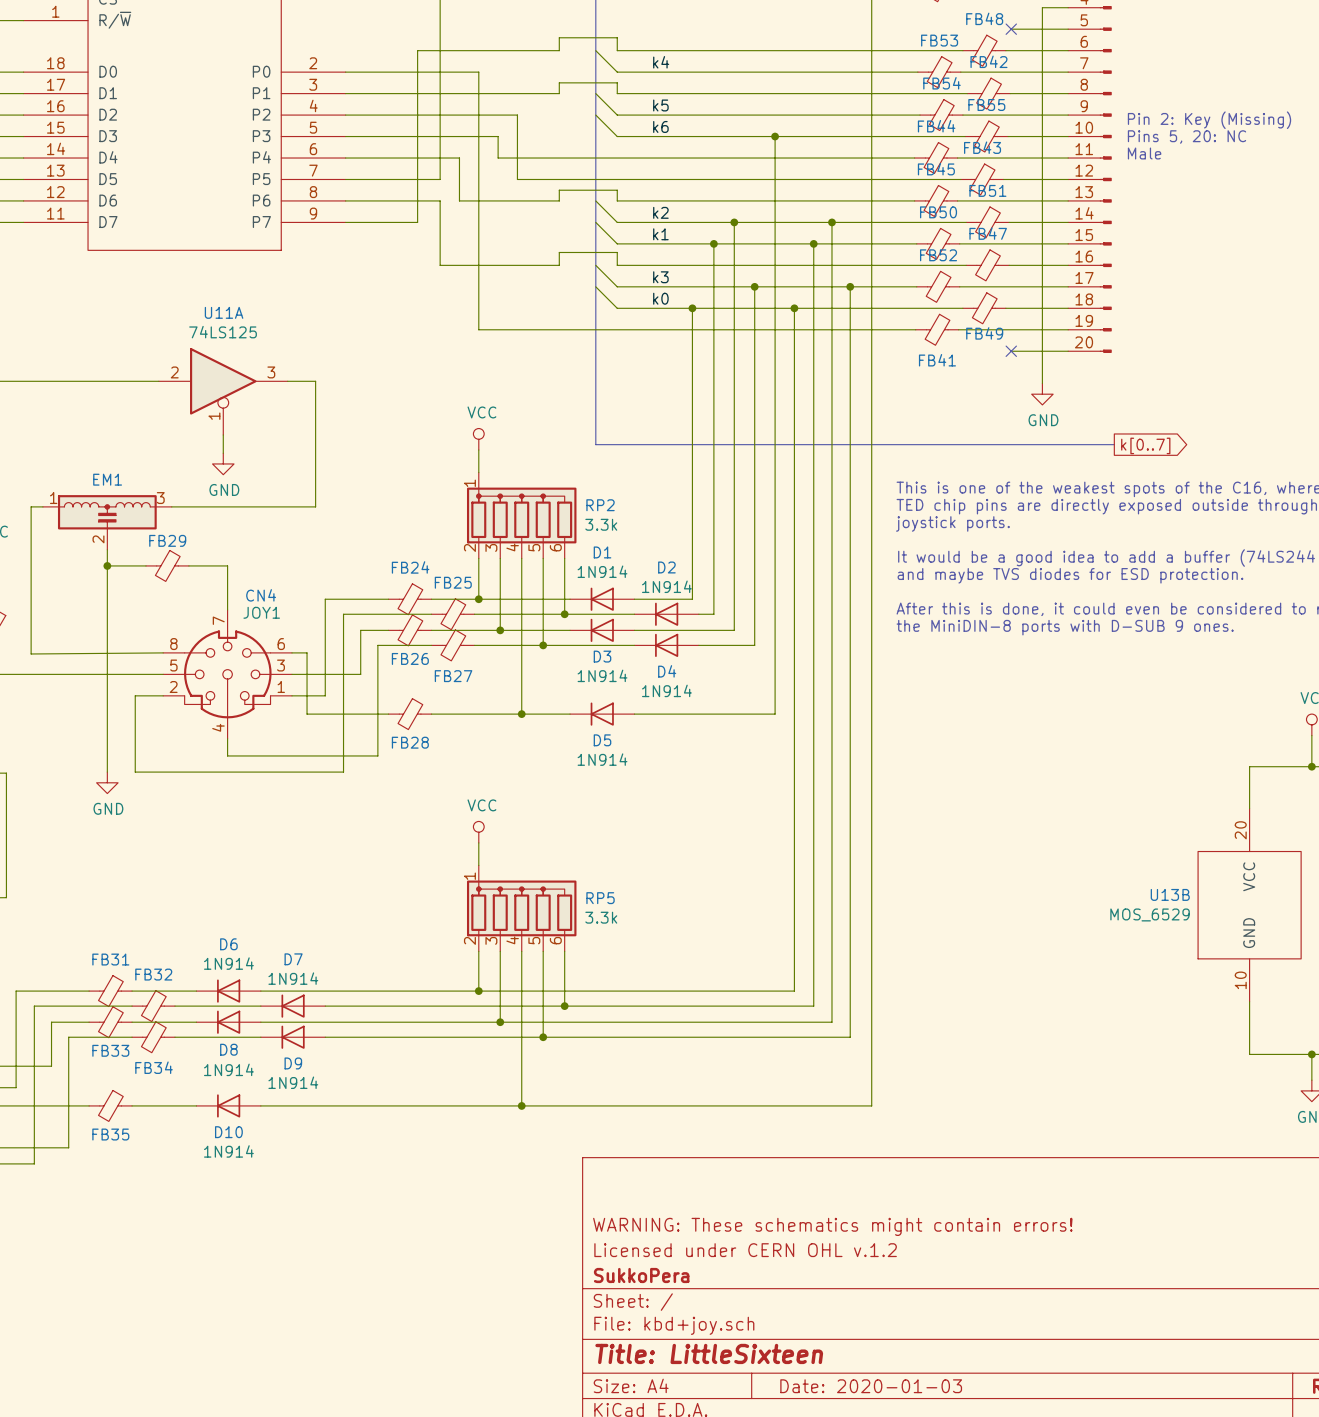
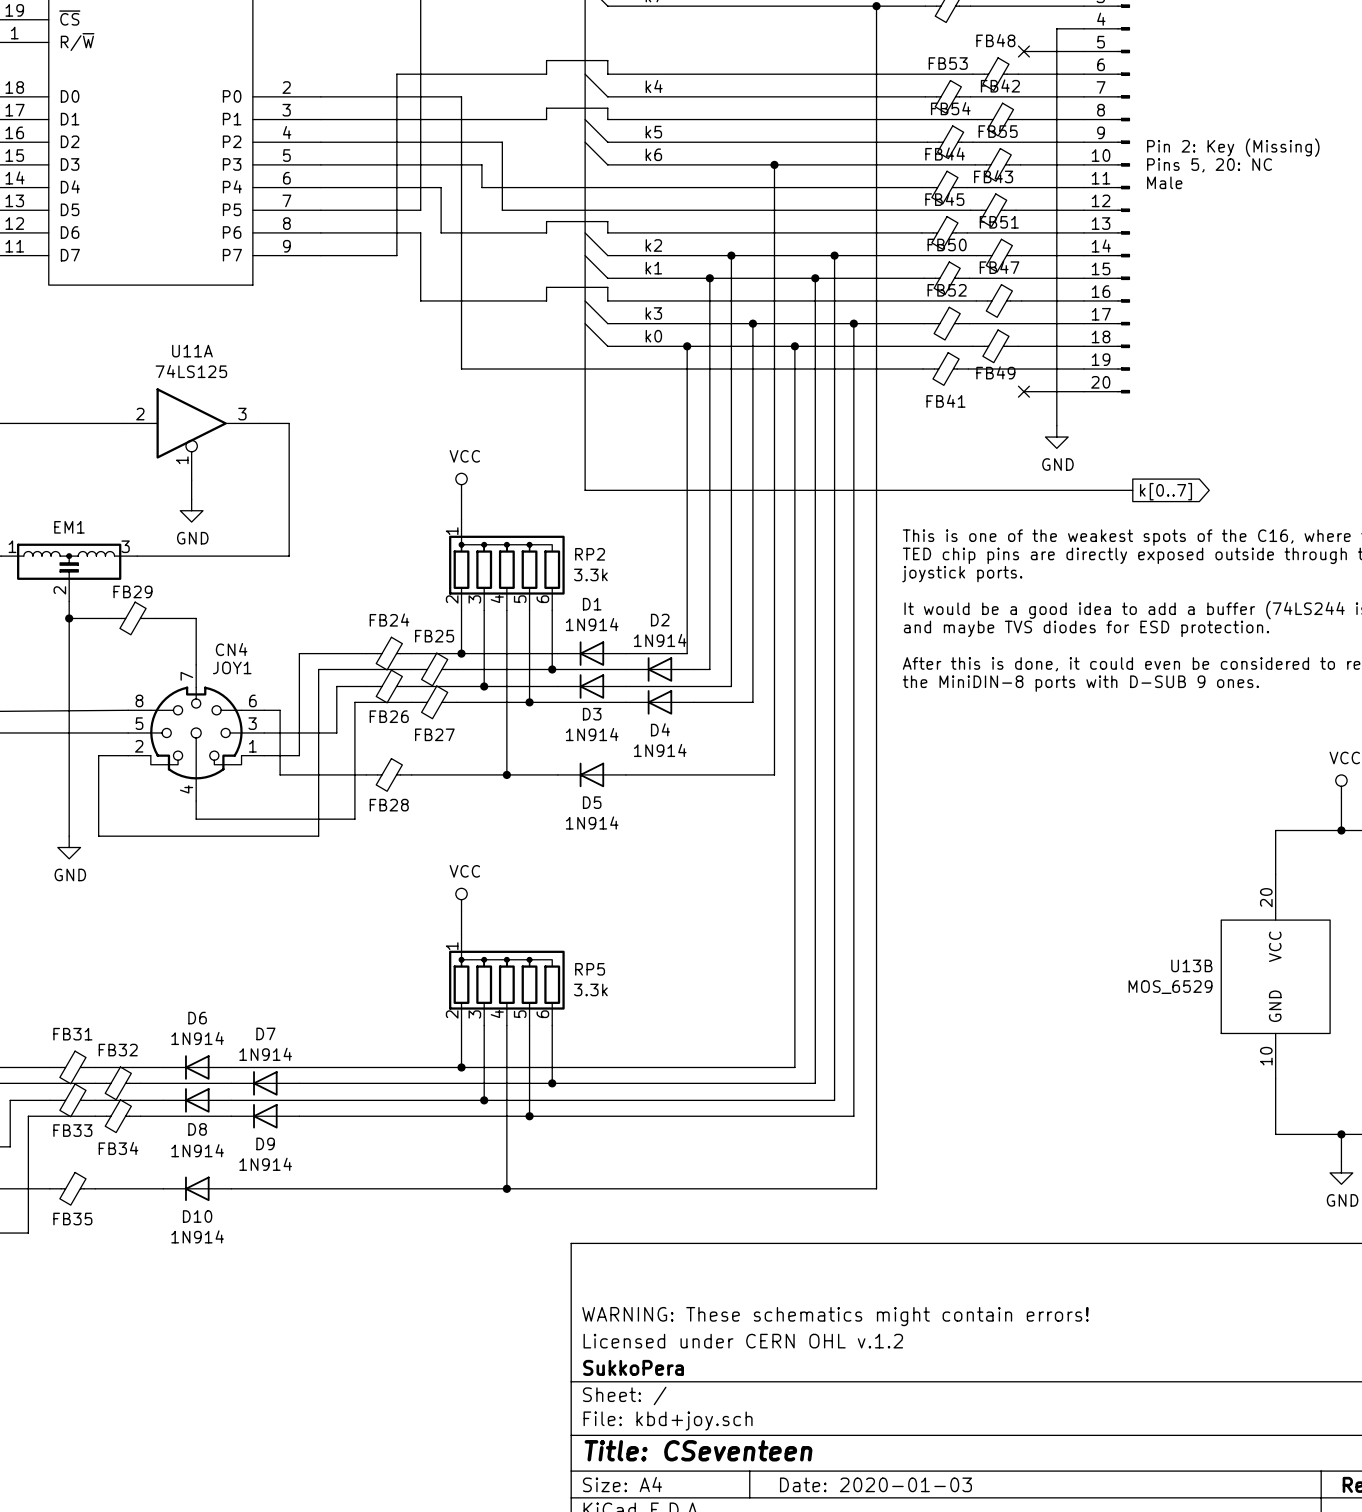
title block: Title: LittleSixteen (709, 1353) -> Title: CSeventeen (698, 1450)

